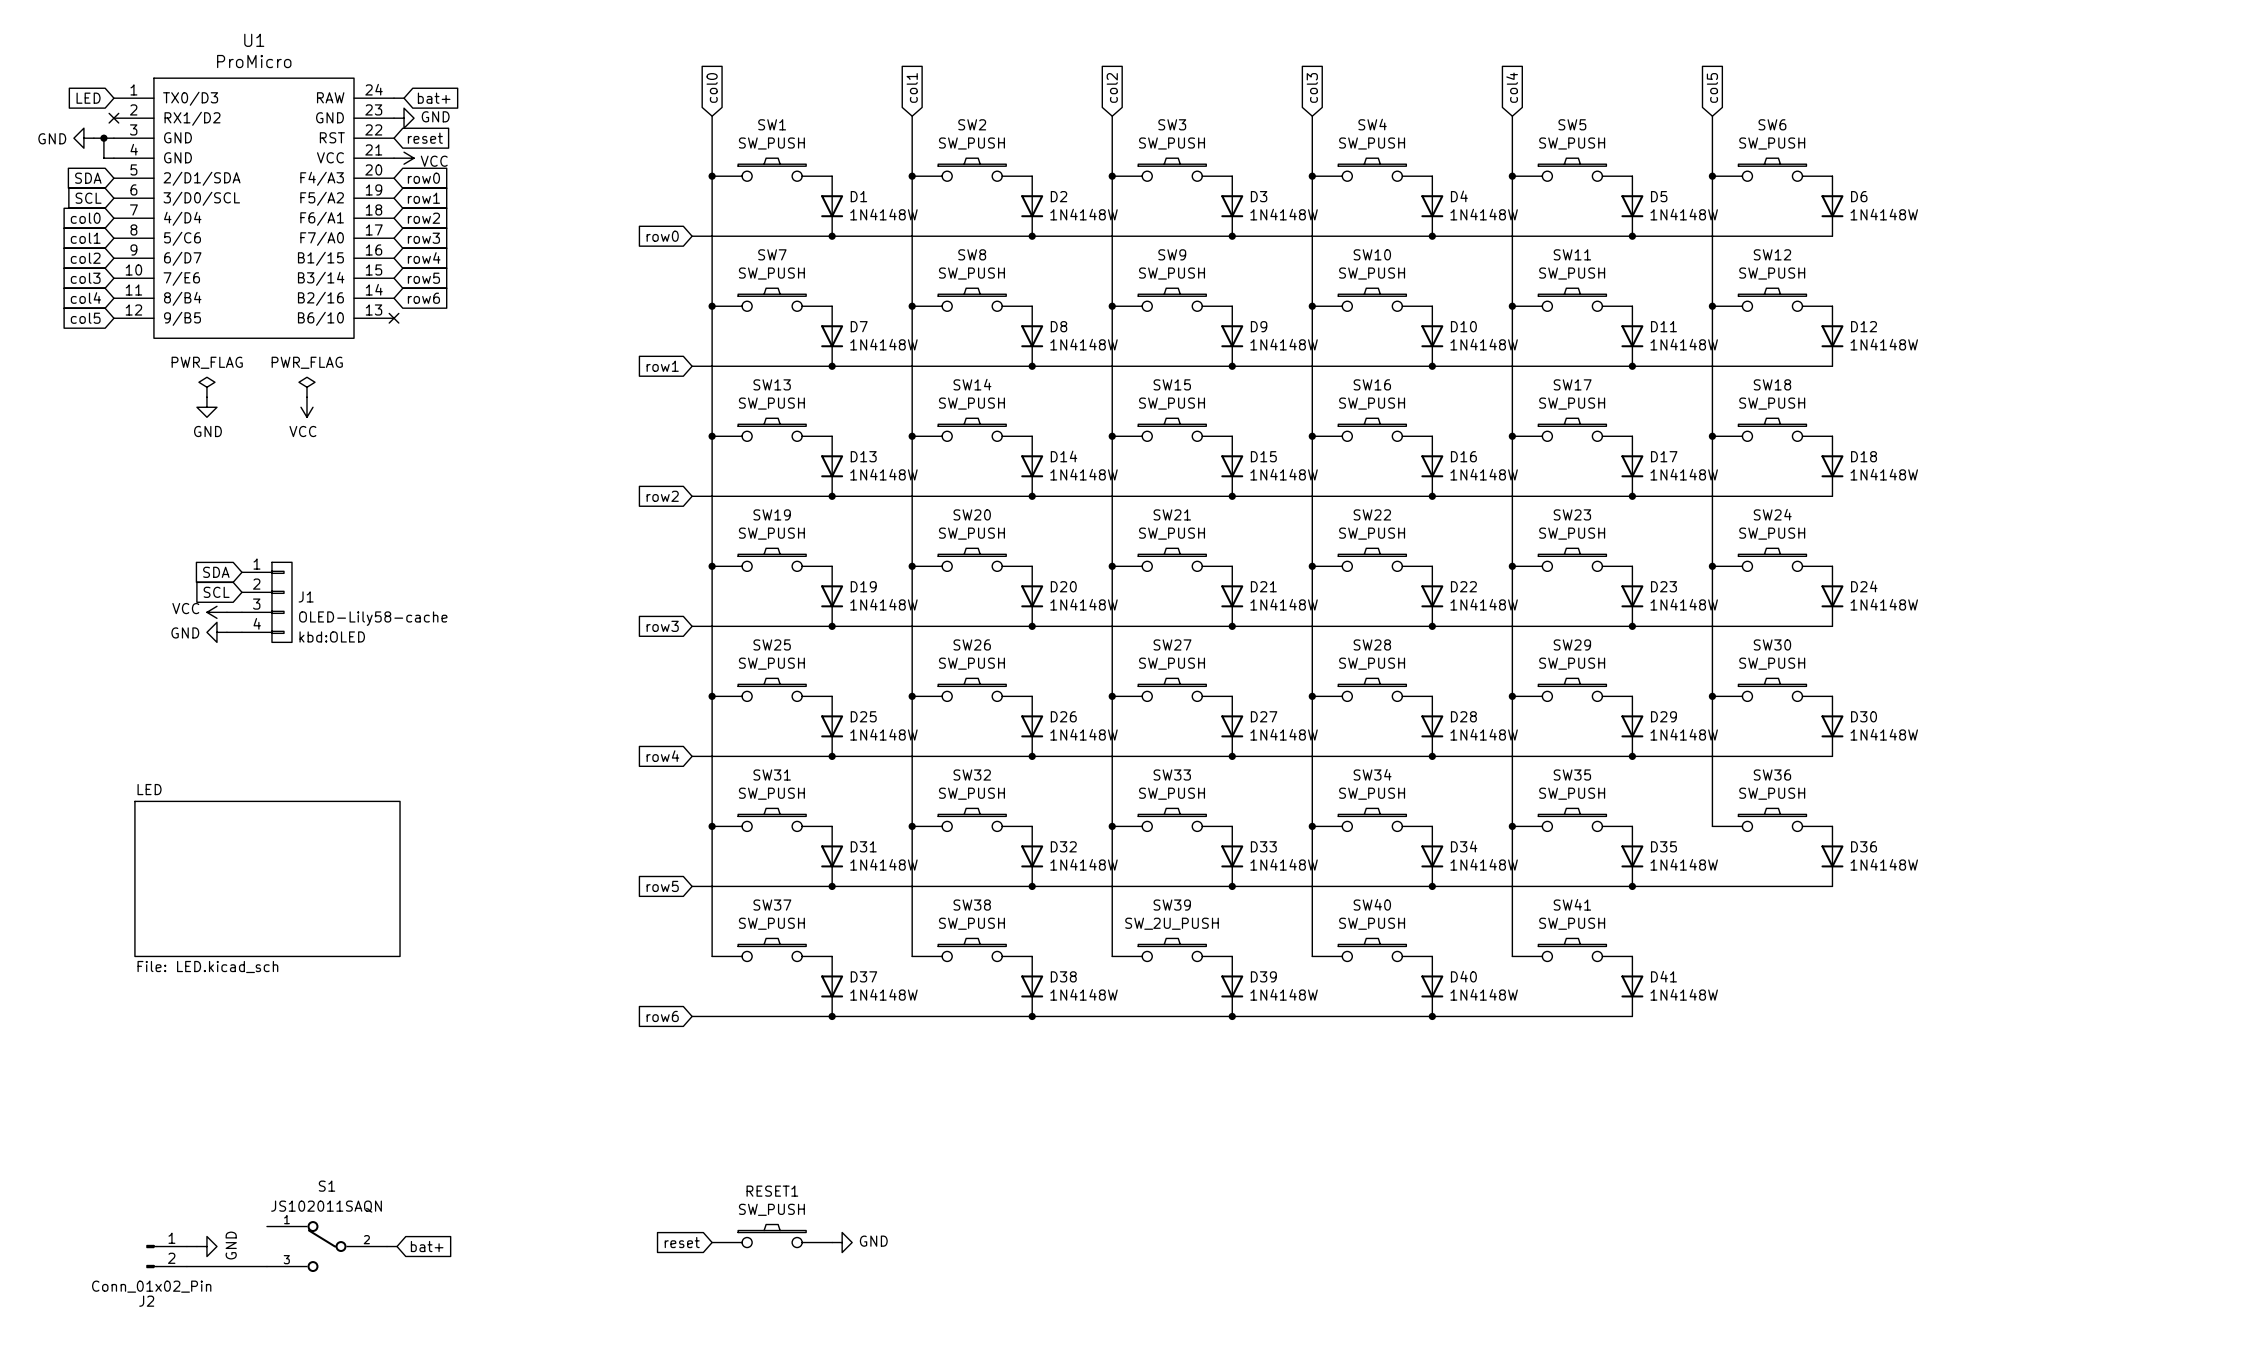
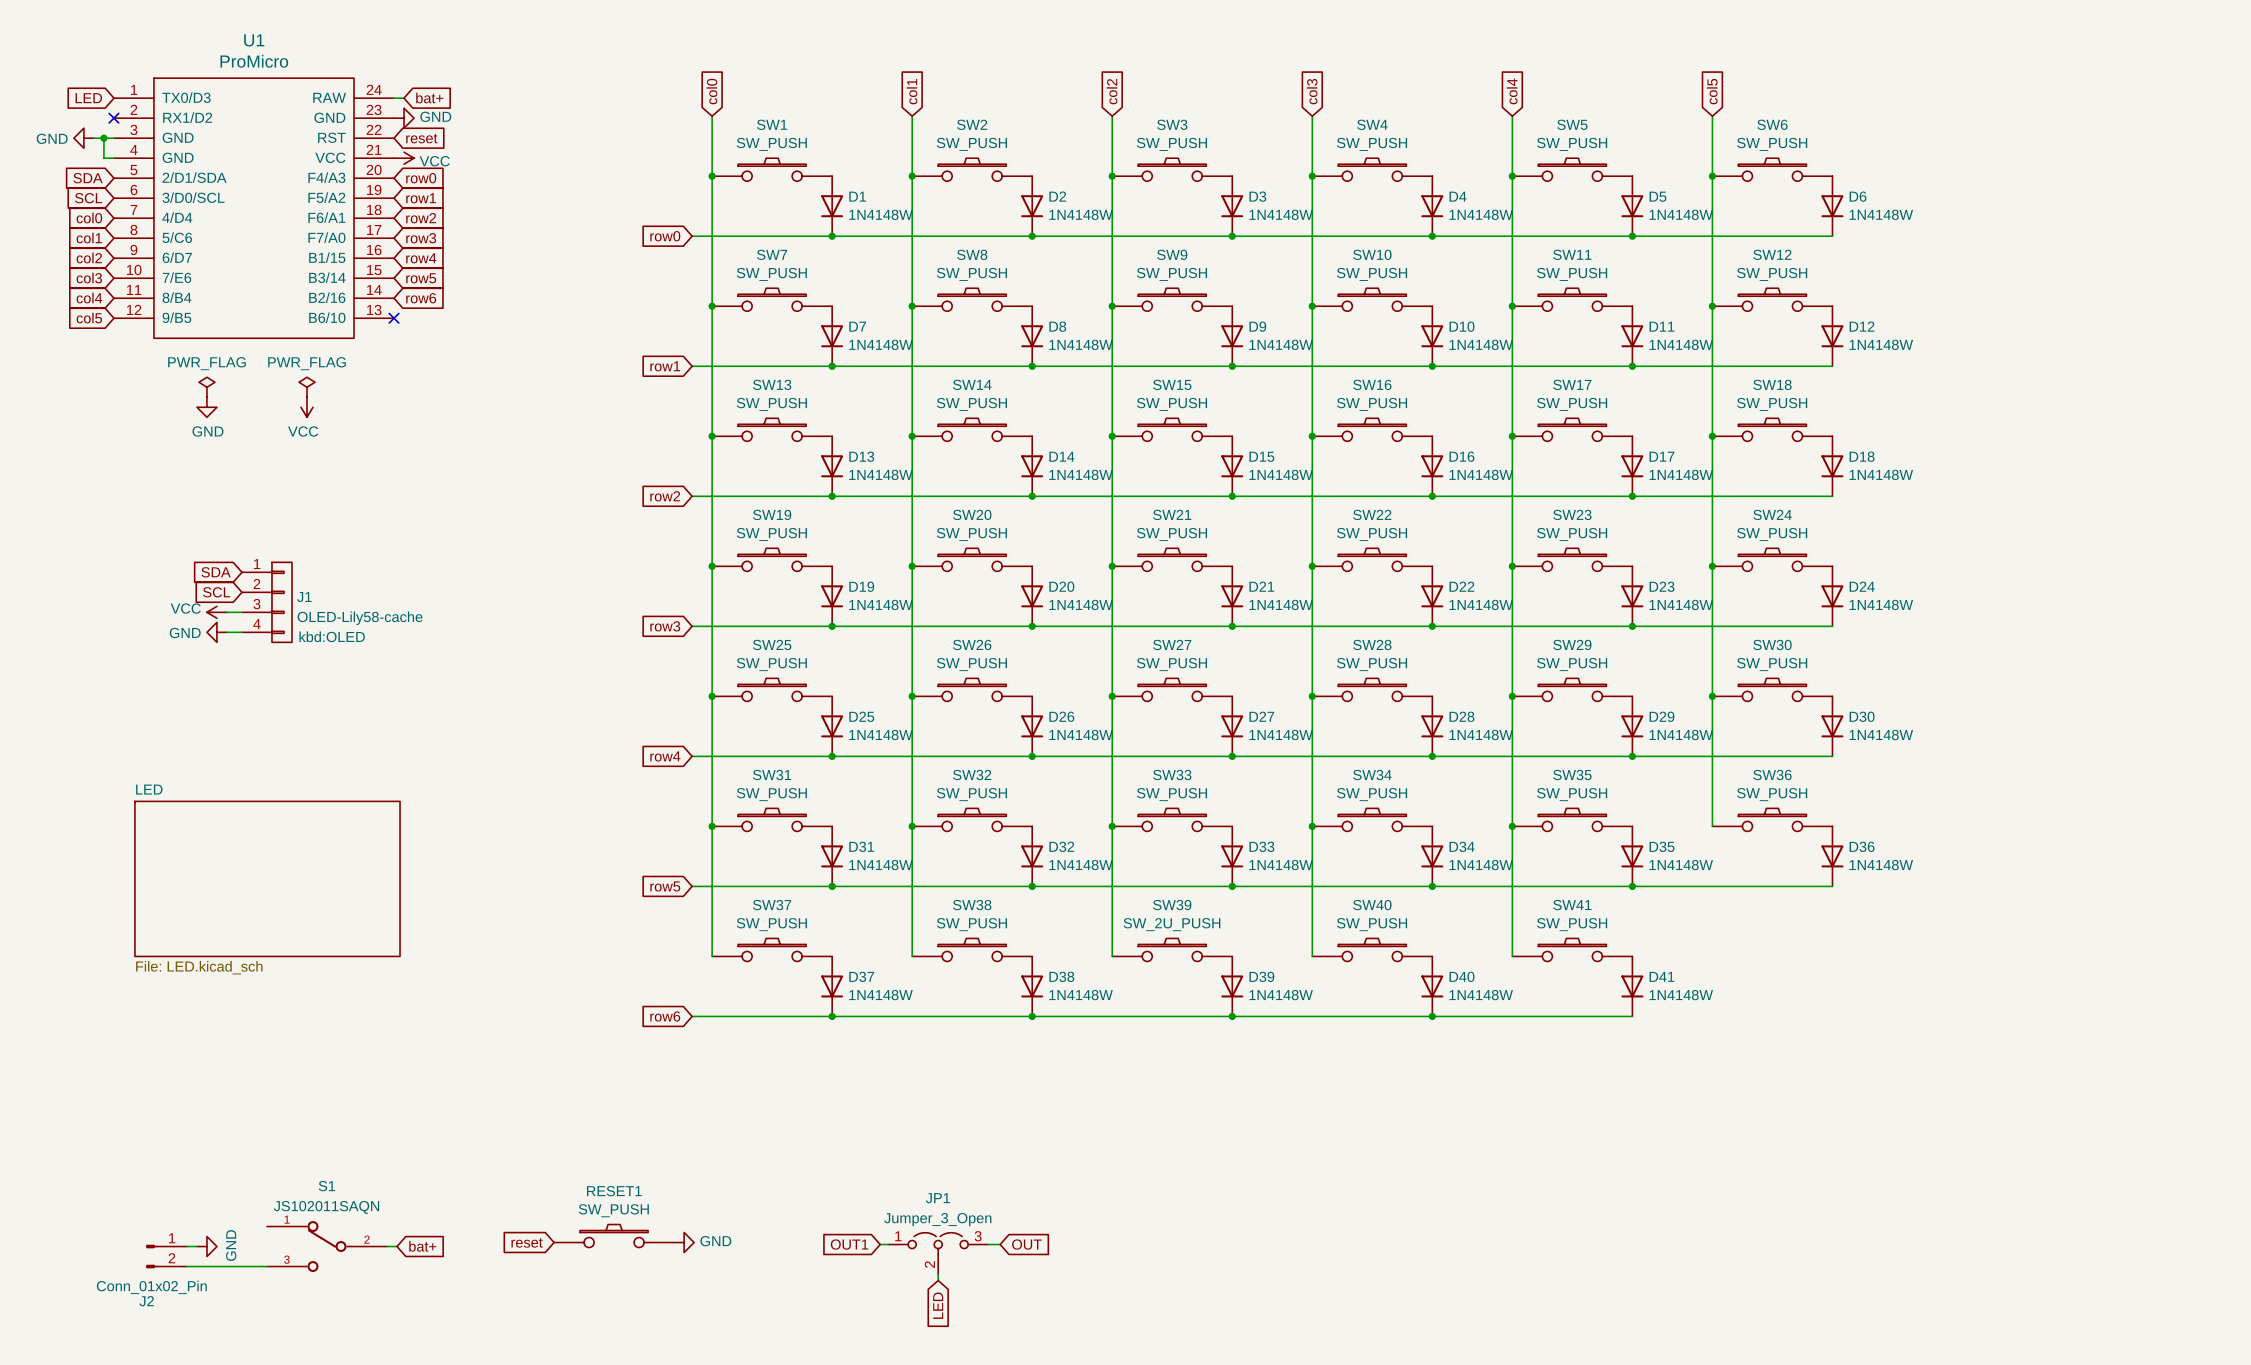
RESET1 position: (772, 1236) -> (614, 1236)
global label position: reset (682, 1242) -> reset (527, 1242)
power symbol position: GND (842, 1242) -> GND (684, 1242)
global label: none -> OUT1 (849, 1244)
wire: none -> (988, 1244) (1000, 1244)
global label: none -> OUT (1026, 1244)
JP1: none -> Jumper_3_Open (938, 1253)
wire: none -> (938, 1274) (938, 1280)
global label: none -> LED (938, 1305)

